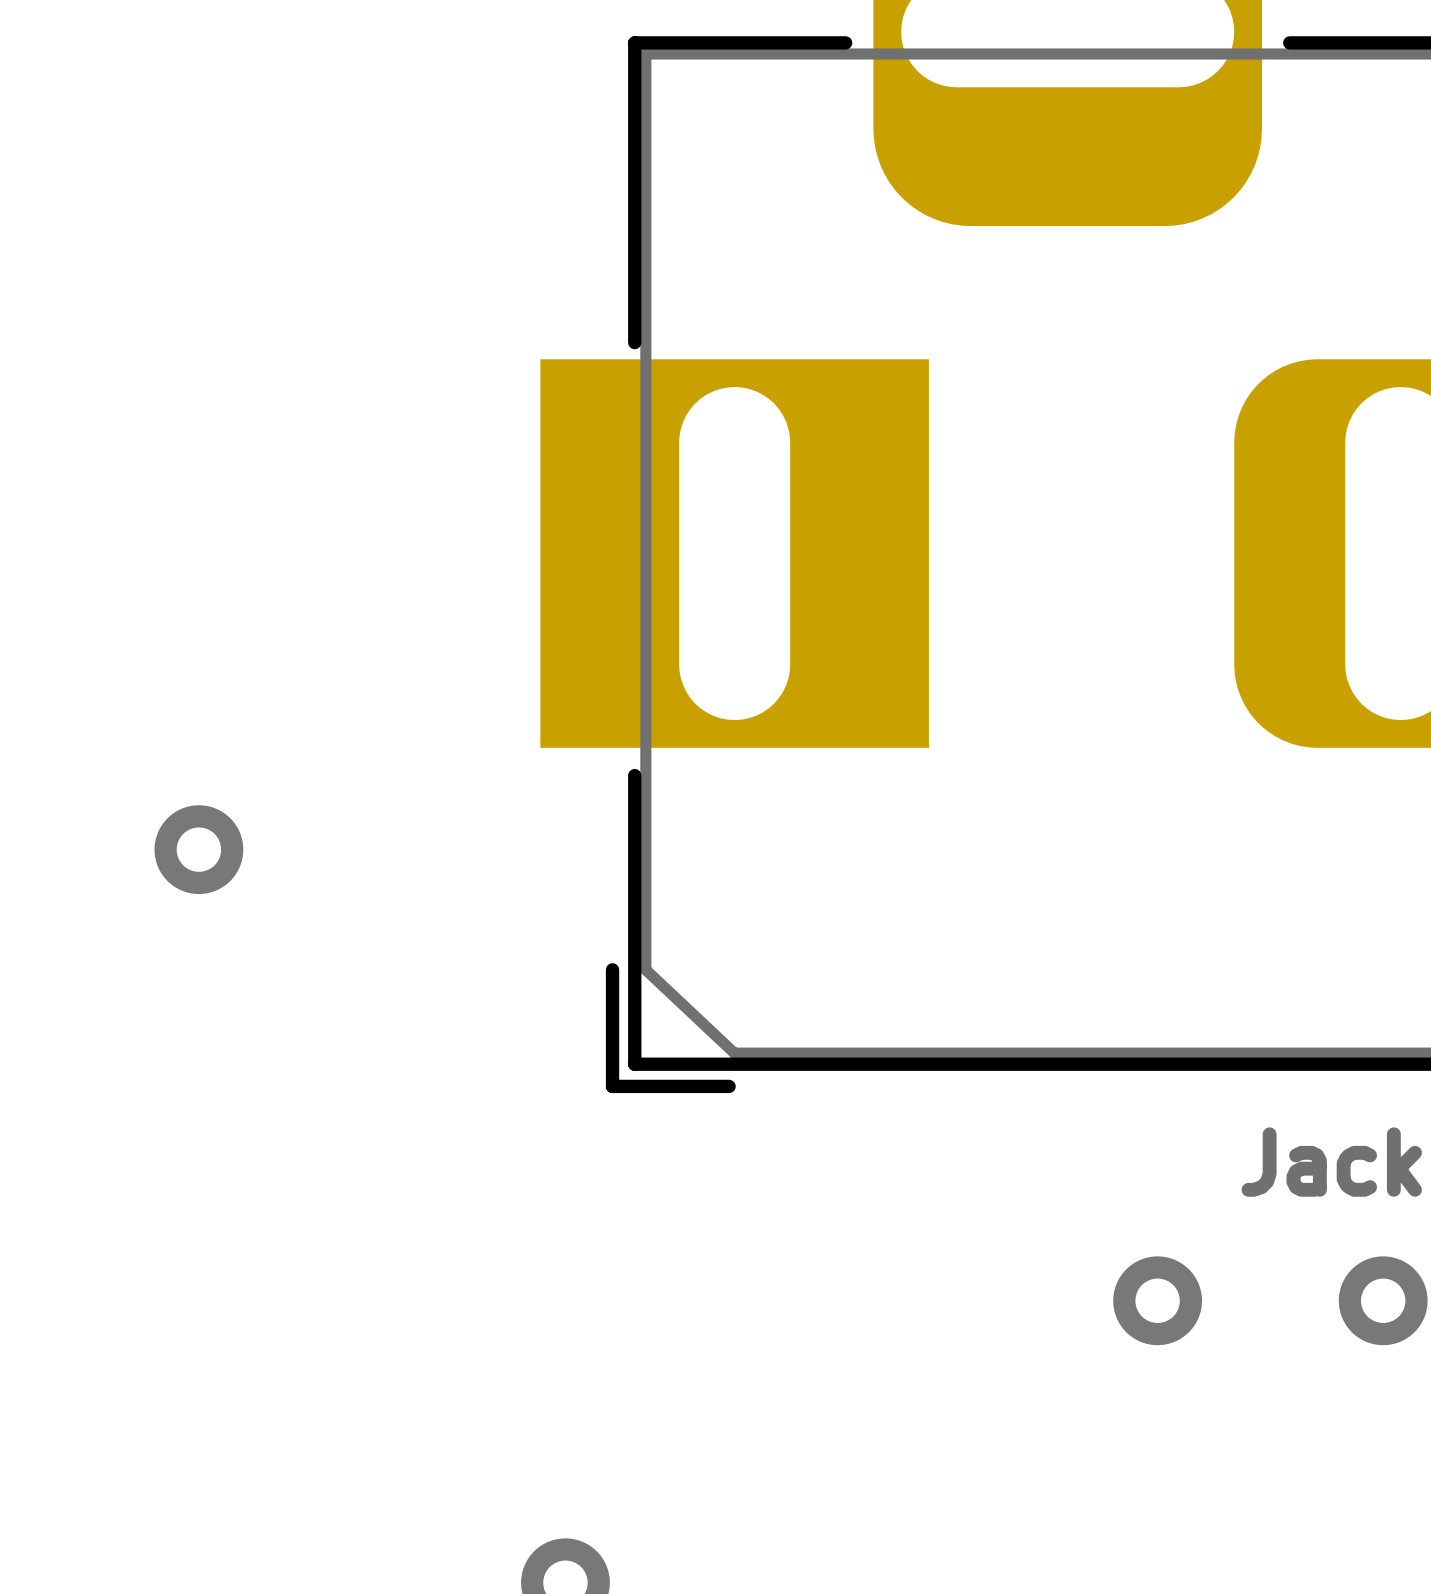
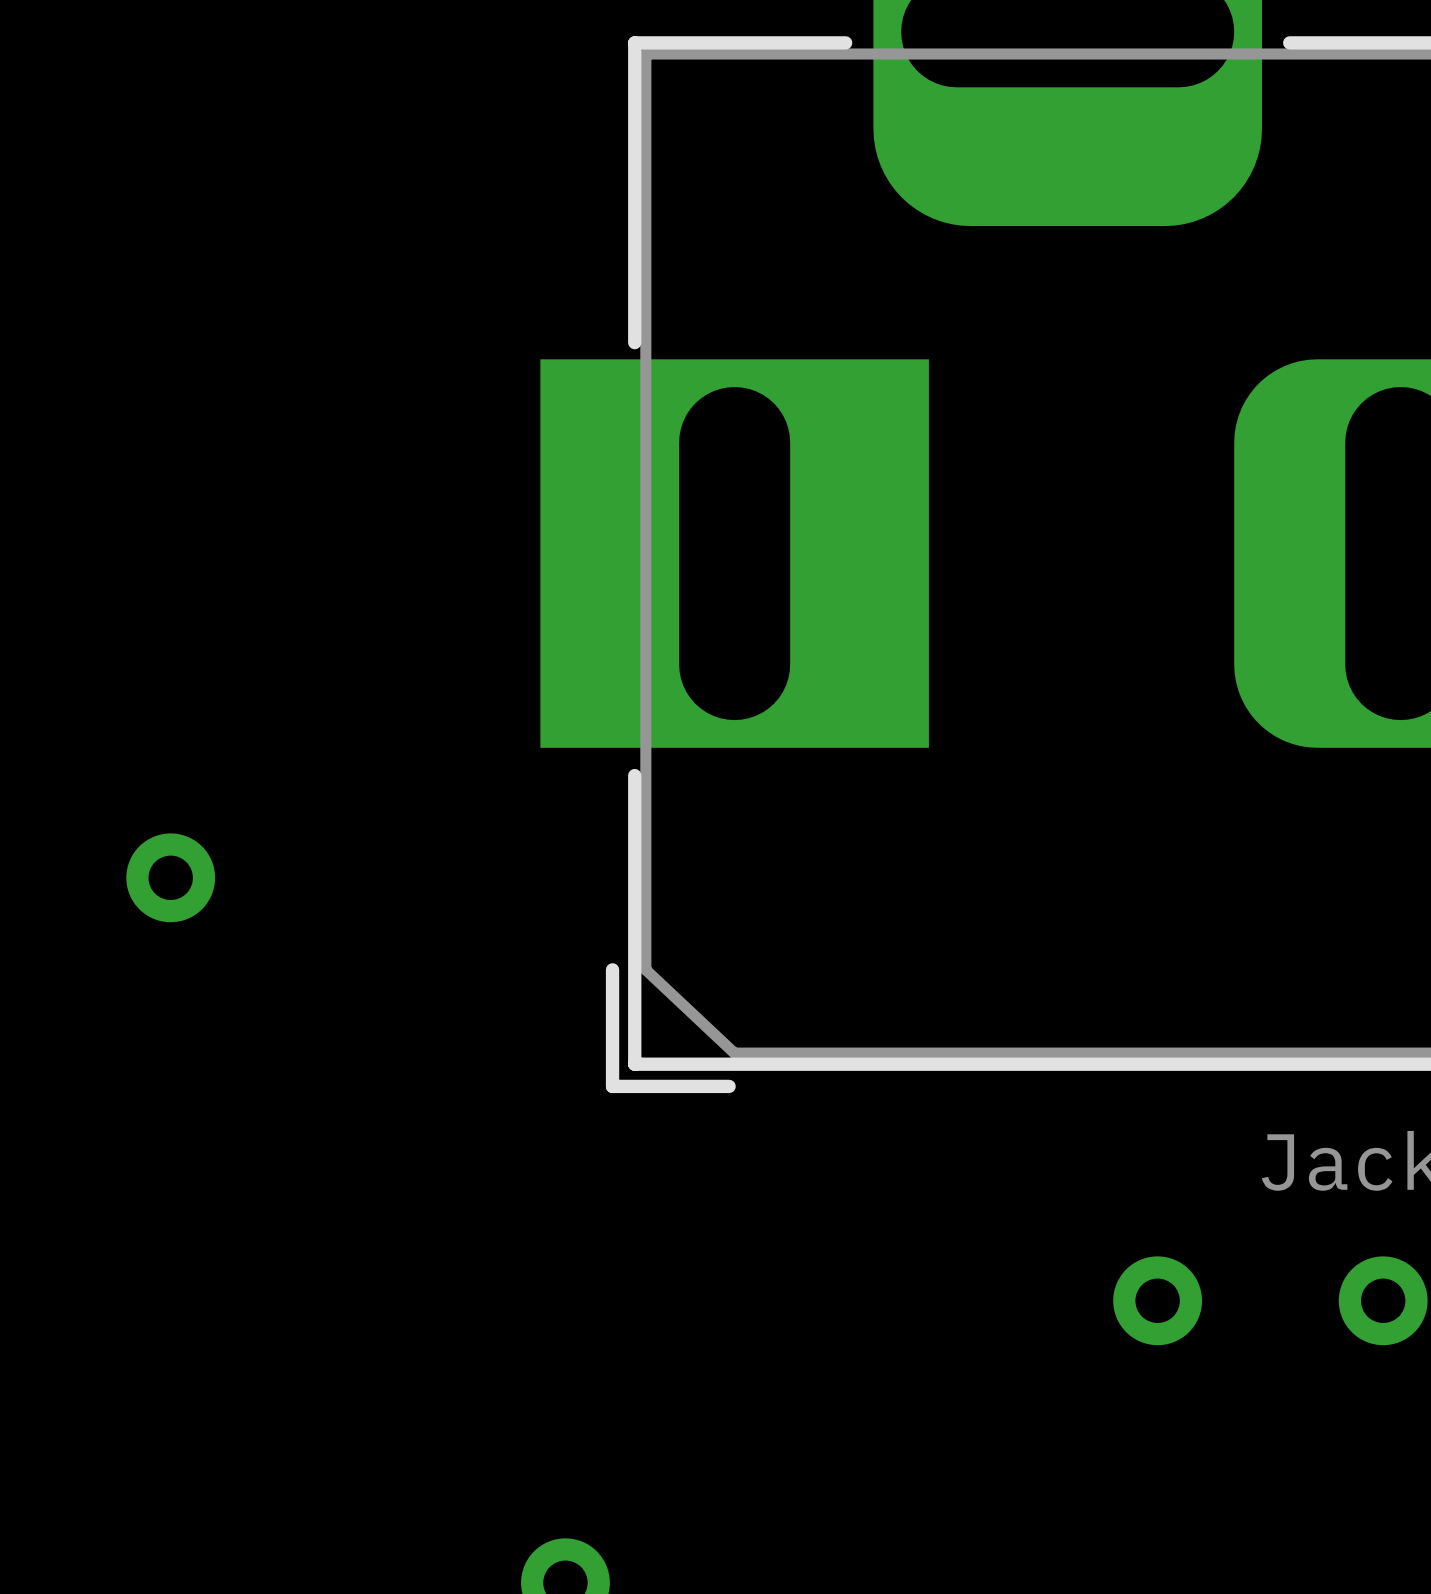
via position: (198, 849) -> (170, 877)

